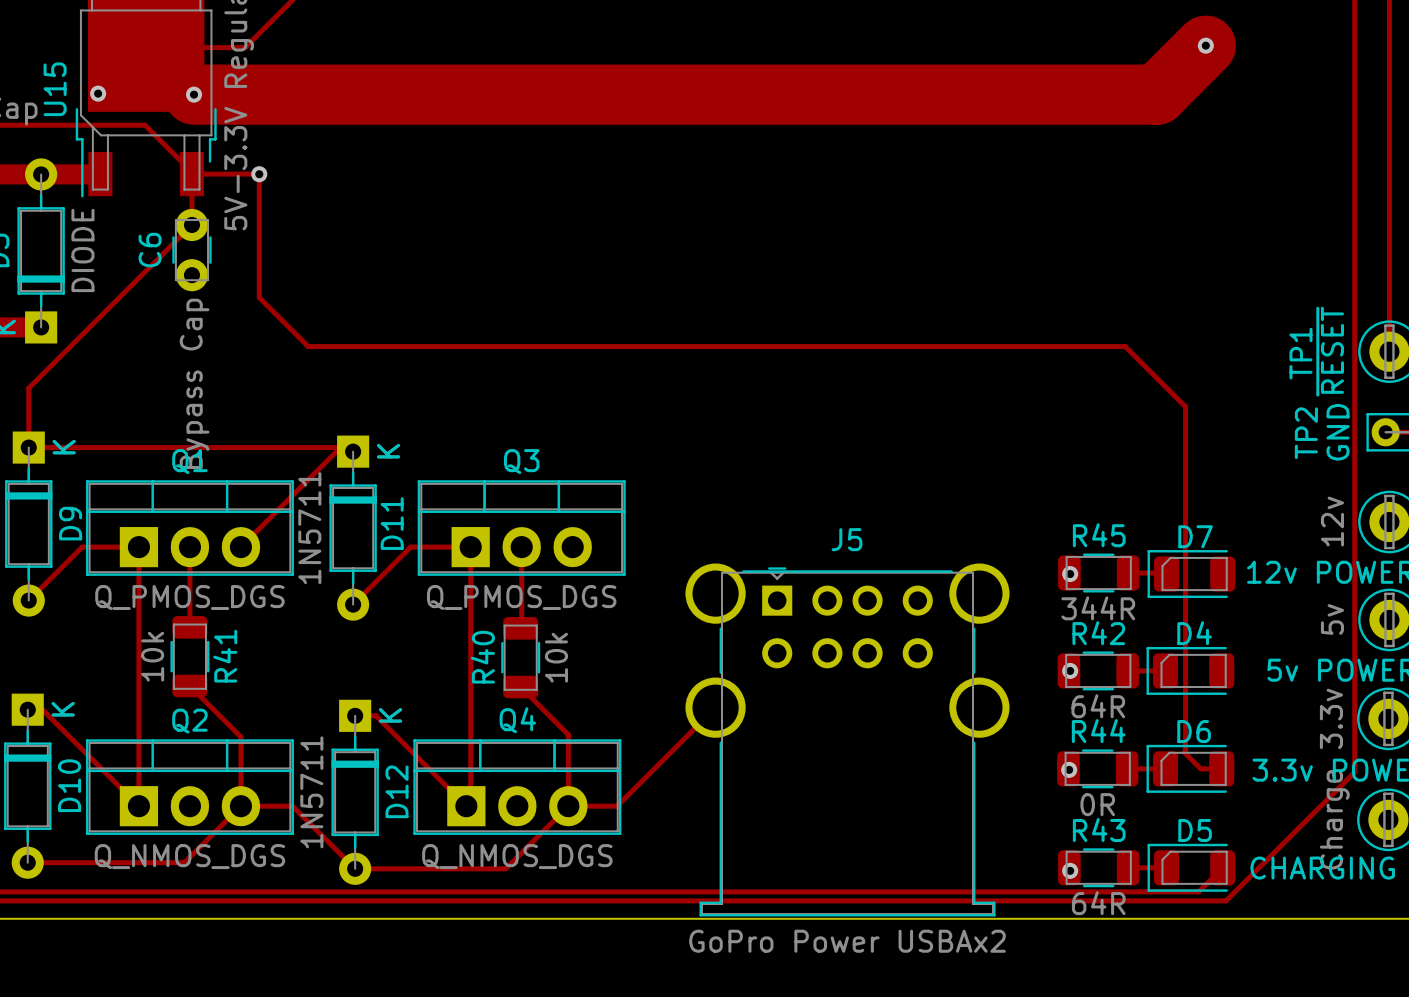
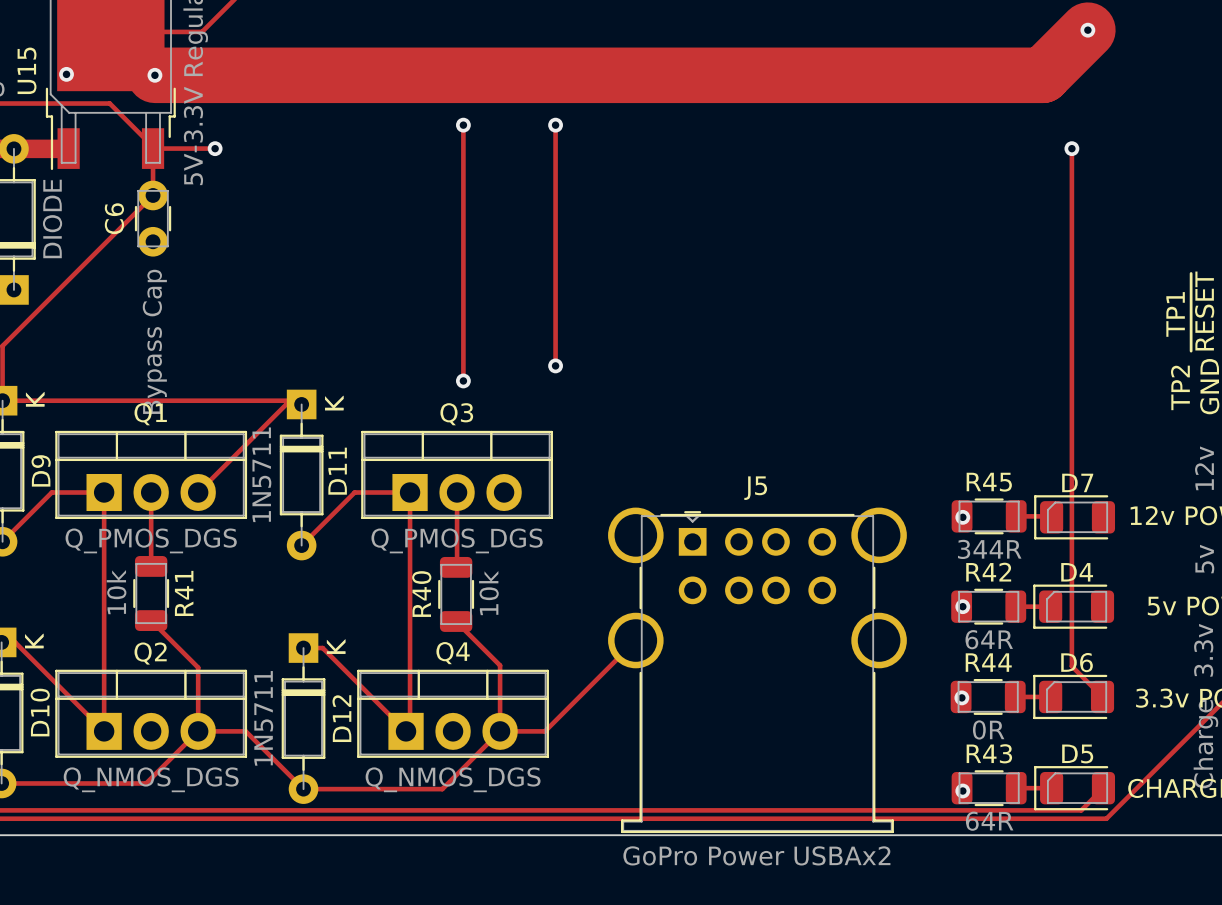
track: none -> (463, 125) (463, 380)
via: none -> (463, 125)
track: none -> (555, 125) (555, 365)
via: none -> (555, 125)
track: (259, 174) (259, 297) (308, 346) (1125, 346) (1185, 406) (1184, 752) (1200, 768) (1221, 768) -> (1071, 148) (1071, 666) (1102, 696)
via: none -> (1071, 148)
via: none -> (555, 365)
via: none -> (463, 380)

